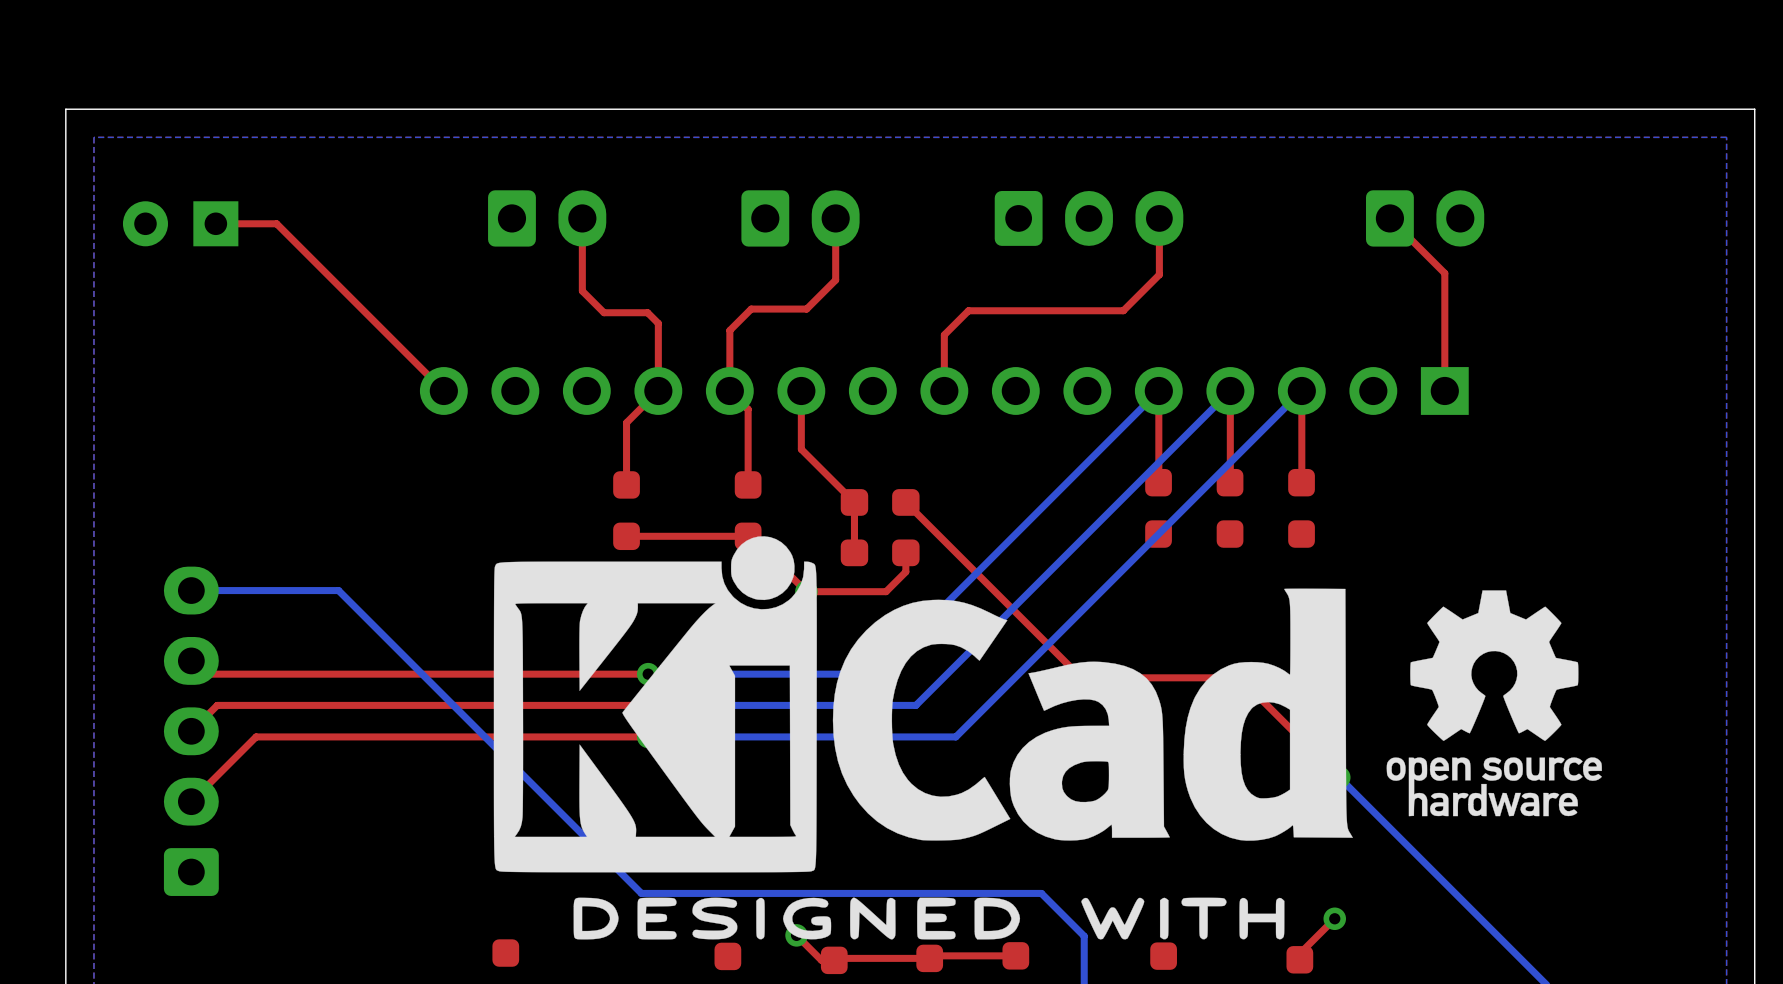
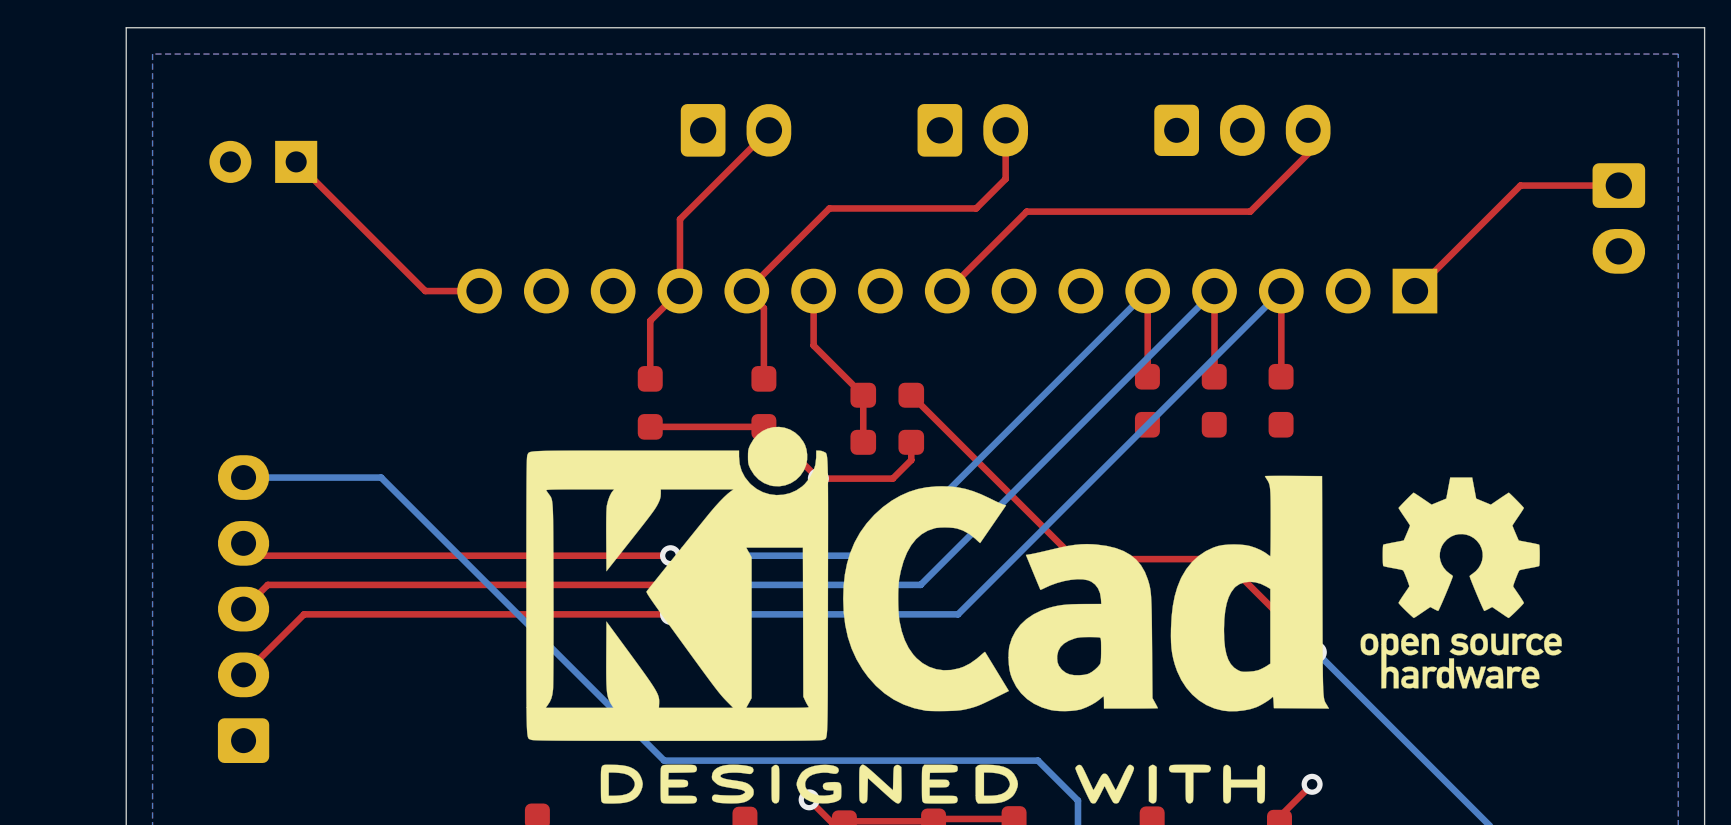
part: (547, 218) -> none
top track: (582, 218) (582, 291) (604, 312) (647, 312) (658, 323) -> (768, 130) (679, 219) (679, 227)
part position: (800, 218) -> (736, 130)
top track: (835, 218) (835, 280) (806, 309) (751, 309) (729, 330) (729, 390) -> (1005, 130) (1005, 179) (976, 208) (829, 208) (746, 291)
part: none -> (972, 130)
part position: (1089, 218) -> (1242, 130)
top track: (1159, 218) (1159, 274) (1123, 310) (968, 310) (944, 334) (944, 390) -> (1308, 130) (1308, 153) (1250, 211) (1026, 211) (947, 291)
top track: (1389, 218) (1444, 273) (1444, 390) -> (1618, 185) (1520, 185) (1414, 291)
part: (1425, 218) -> none
part position: (180, 223) -> (263, 161)
top track: (215, 223) (276, 223) (443, 390) -> (296, 161) (425, 291) (479, 291)
part: none -> (1618, 218)

